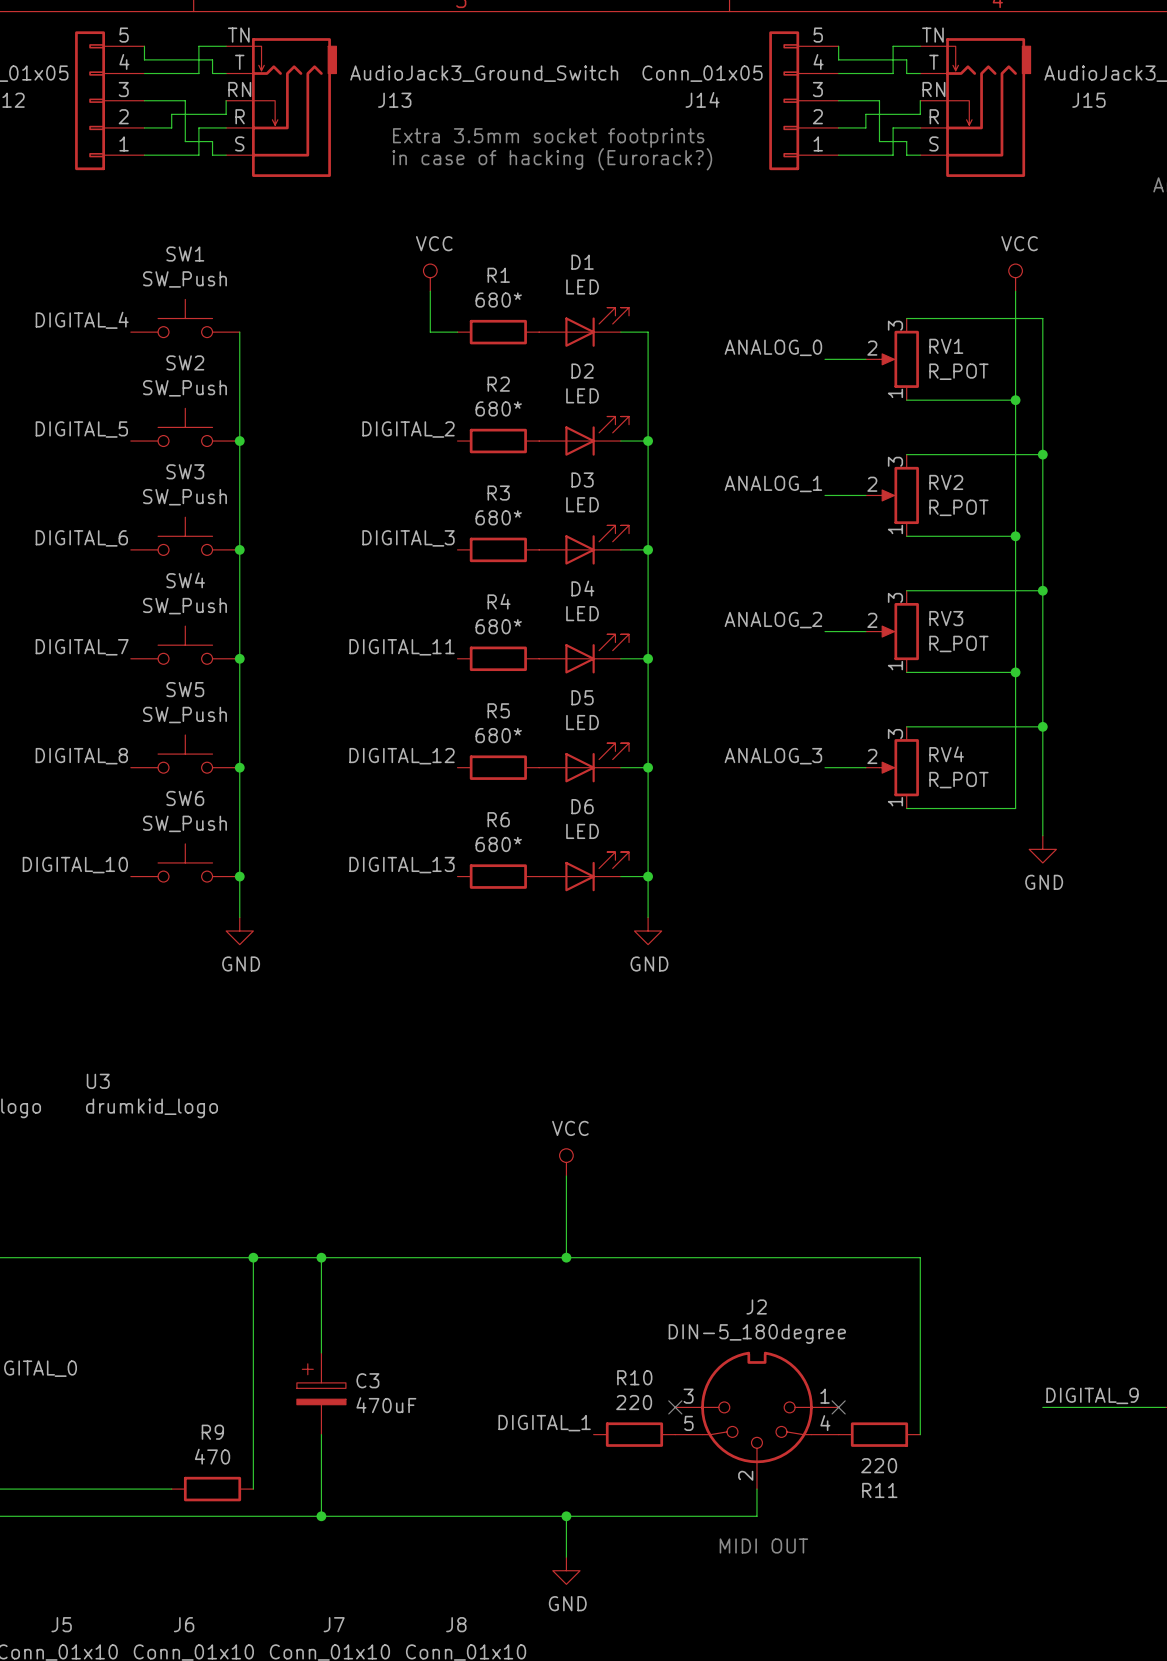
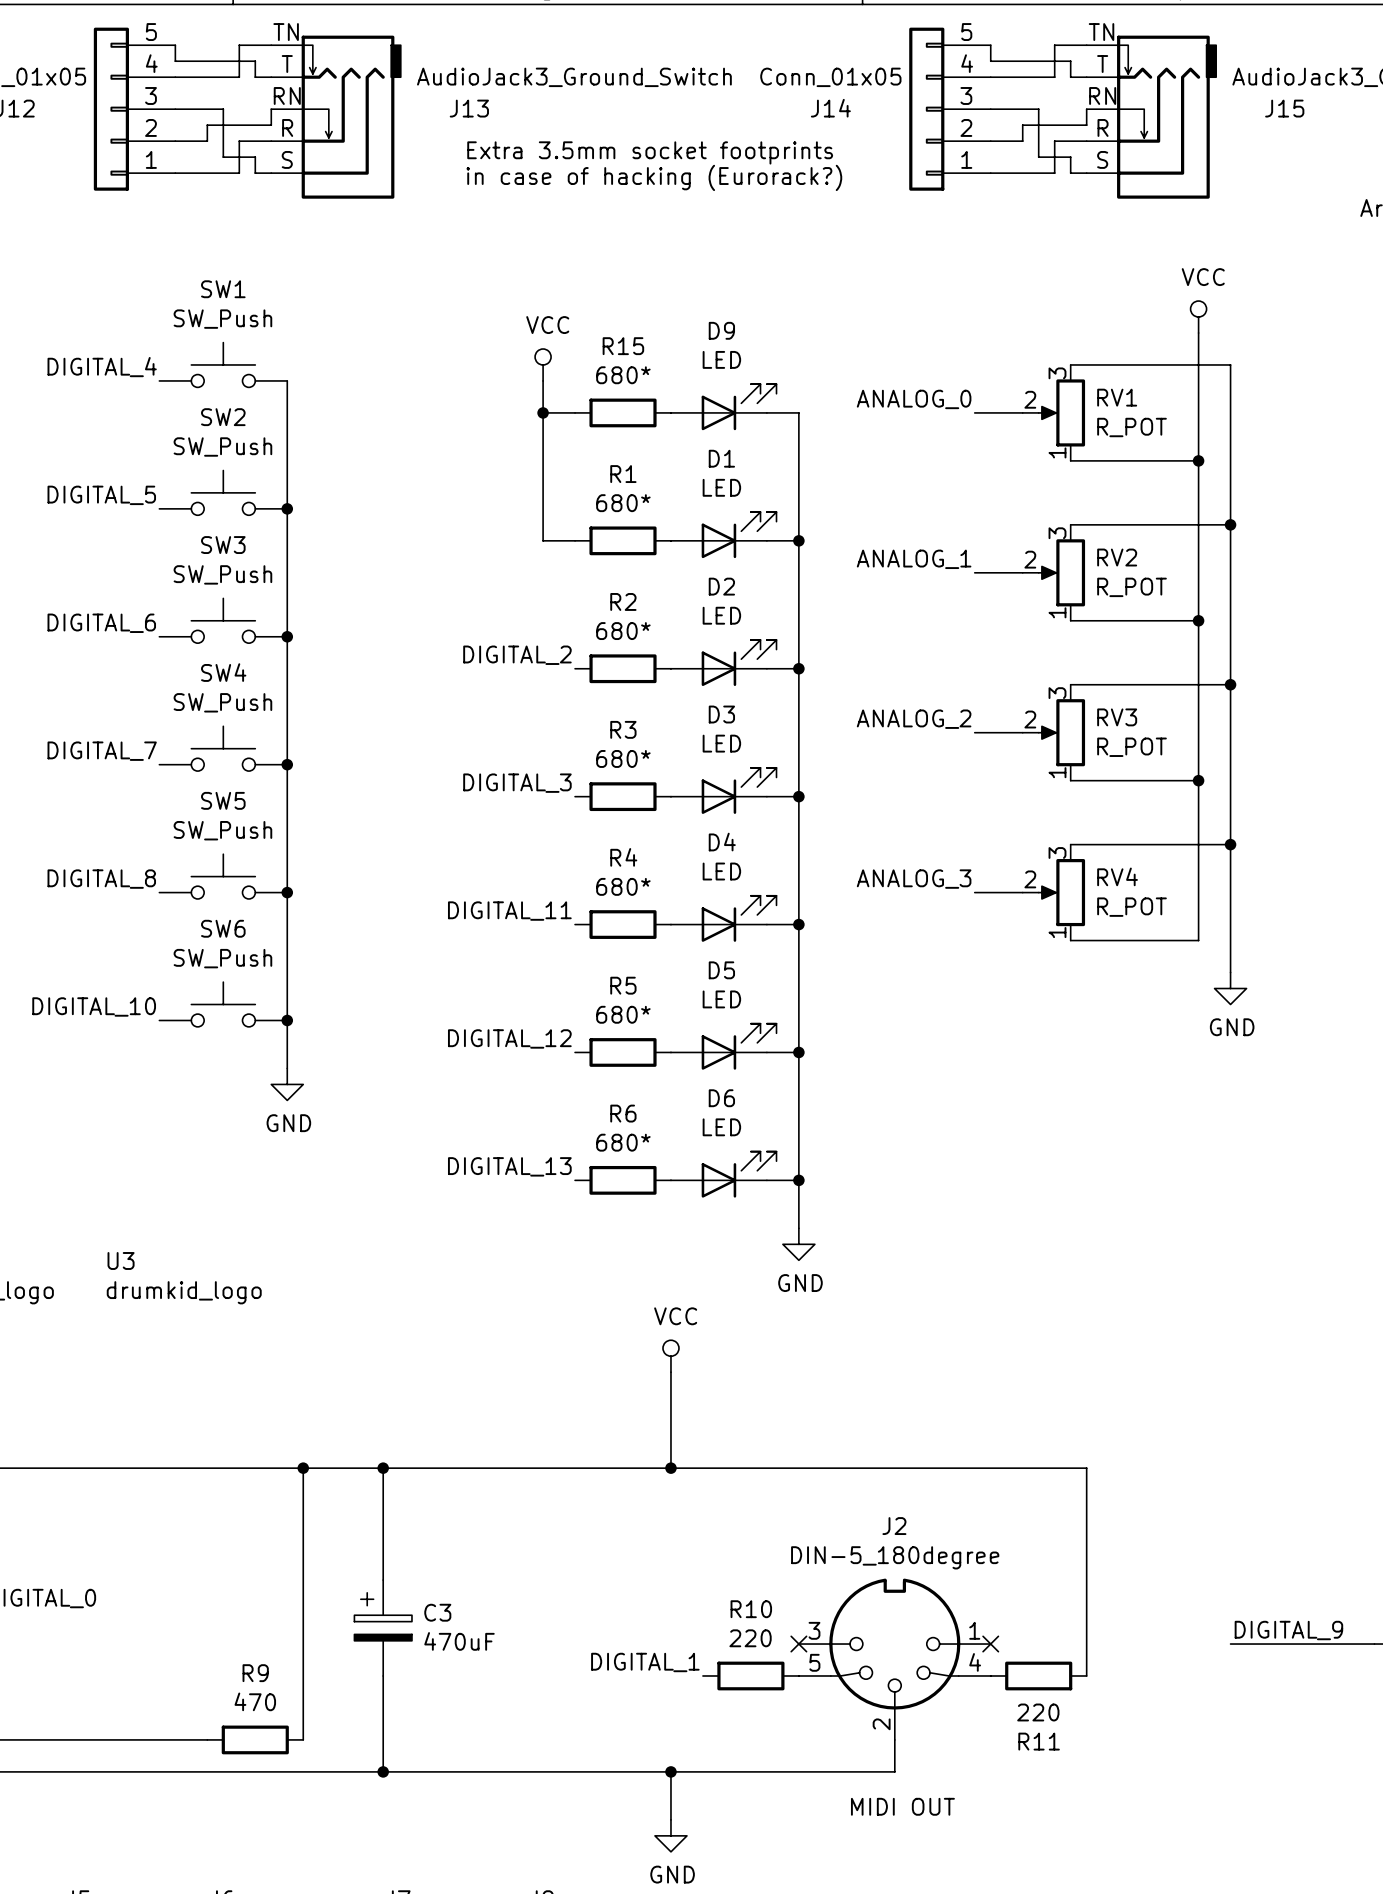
power symbol position: VCC (430, 277) -> VCC (543, 364)
wire: (430, 291) (430, 332) (457, 332) -> (575, 540) (543, 540) (543, 380)
D1 position: (584, 327) -> (723, 535)
R1 position: (498, 332) -> (623, 540)
wire: (620, 332) (648, 332) (648, 917) -> none
D9: none -> LED (723, 407)
wire: none -> (543, 412) (575, 412)
junction: none -> (543, 412)
R15: none -> 680* (623, 412)
wire: none -> (766, 412) (798, 412) (798, 1228)
label position: DIGITAL_2 (408, 429) -> DIGITAL_2 (517, 655)
D2 position: (584, 436) -> (723, 663)
R2 position: (498, 441) -> (623, 668)
wire: (620, 441) (648, 441) -> (766, 540) (798, 540)
junction position: (648, 441) -> (798, 540)
label position: DIGITAL_3 (408, 538) -> DIGITAL_3 (517, 783)
D3 position: (584, 545) -> (723, 790)
R3 position: (498, 549) -> (623, 796)
wire: (620, 549) (648, 549) -> (766, 668) (798, 668)
junction position: (648, 549) -> (798, 668)
label position: DIGITAL_11 (402, 647) -> DIGITAL_11 (509, 911)
D4 position: (584, 653) -> (723, 918)
R4 position: (498, 658) -> (623, 924)
wire: (620, 658) (648, 658) -> (766, 796) (798, 796)
junction position: (648, 658) -> (798, 796)
label position: DIGITAL_12 (402, 756) -> DIGITAL_12 (509, 1038)
D5 position: (584, 762) -> (723, 1046)
R5 position: (498, 767) -> (623, 1052)
wire: (620, 767) (648, 767) -> (766, 924) (798, 924)
junction position: (648, 767) -> (798, 924)
label position: DIGITAL_13 (402, 865) -> DIGITAL_13 (509, 1166)
D6 position: (584, 871) -> (723, 1174)
R6 position: (498, 876) -> (623, 1180)
wire: (620, 876) (648, 876) -> (766, 1052) (798, 1052)
junction position: (648, 876) -> (798, 1052)
power symbol position: GND (648, 931) -> GND (798, 1244)
wire: none -> (766, 1180) (798, 1180)
junction: none -> (798, 1180)

